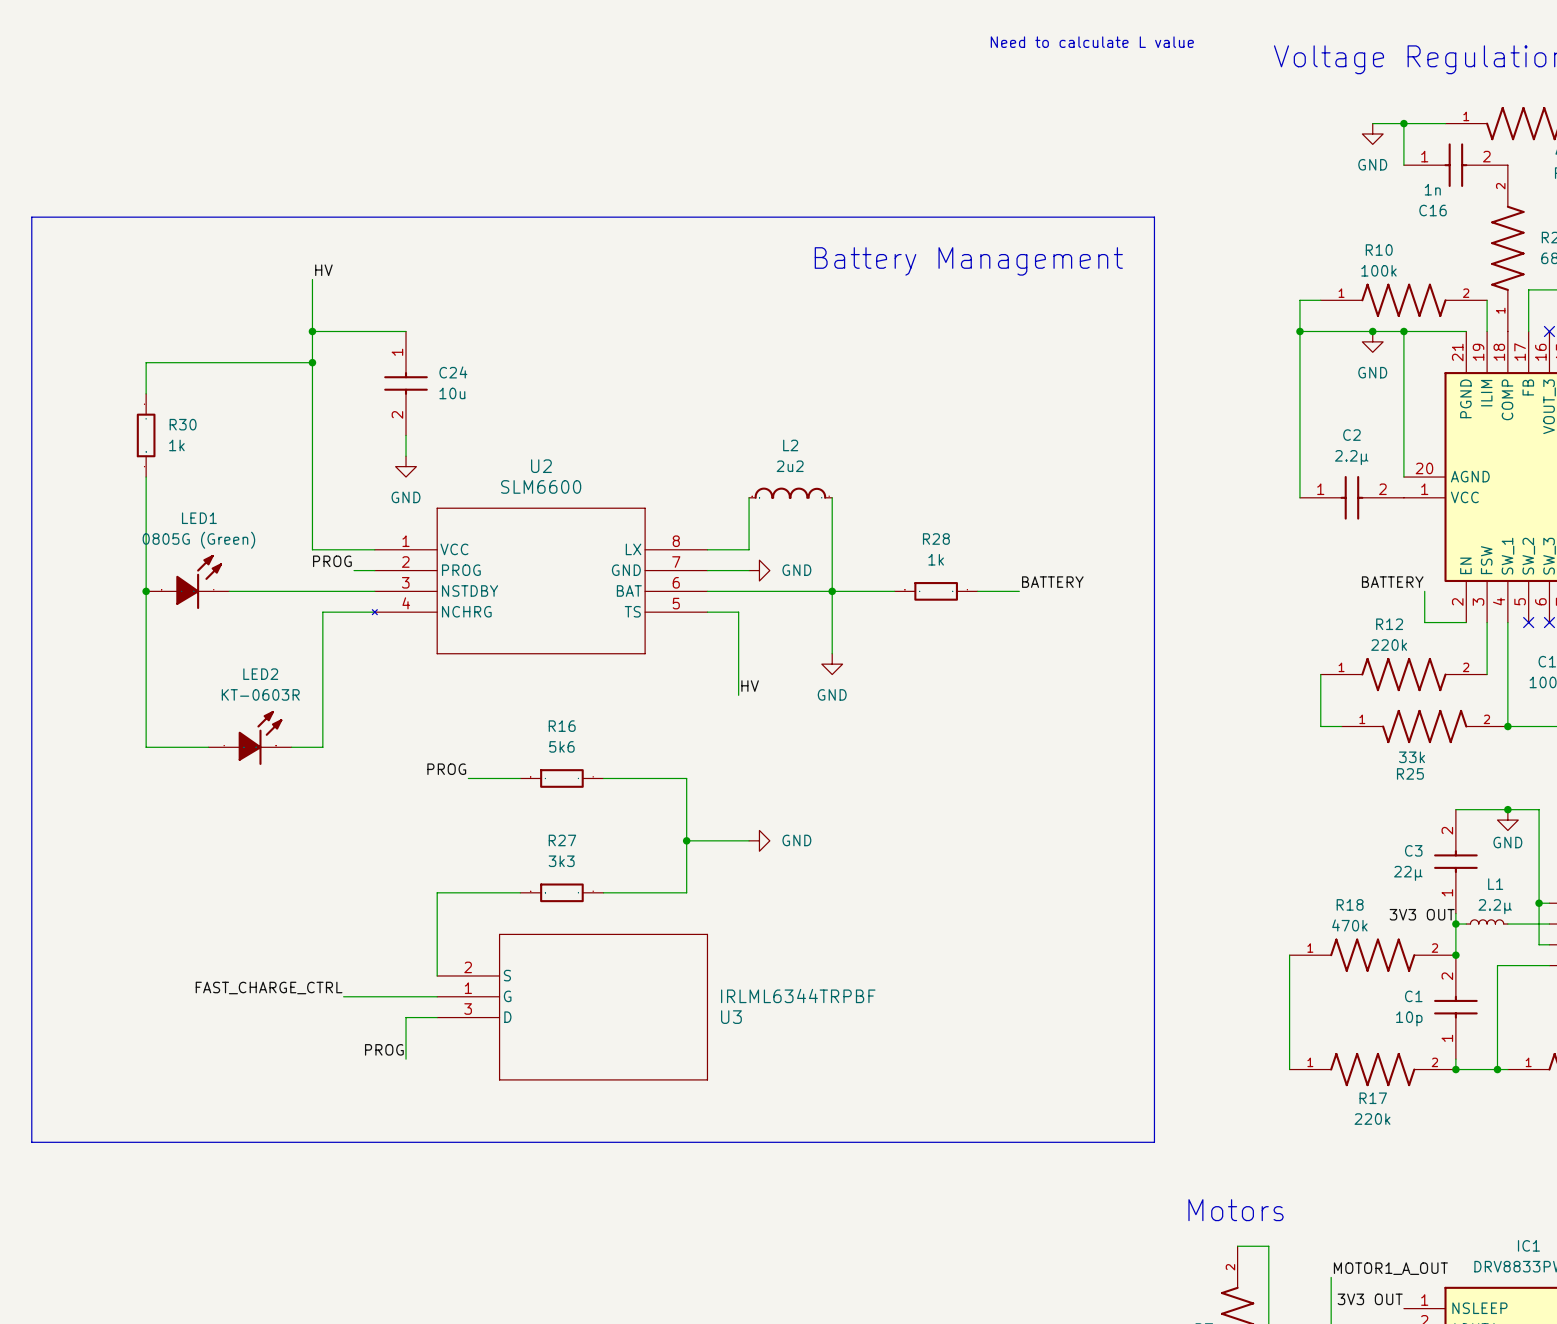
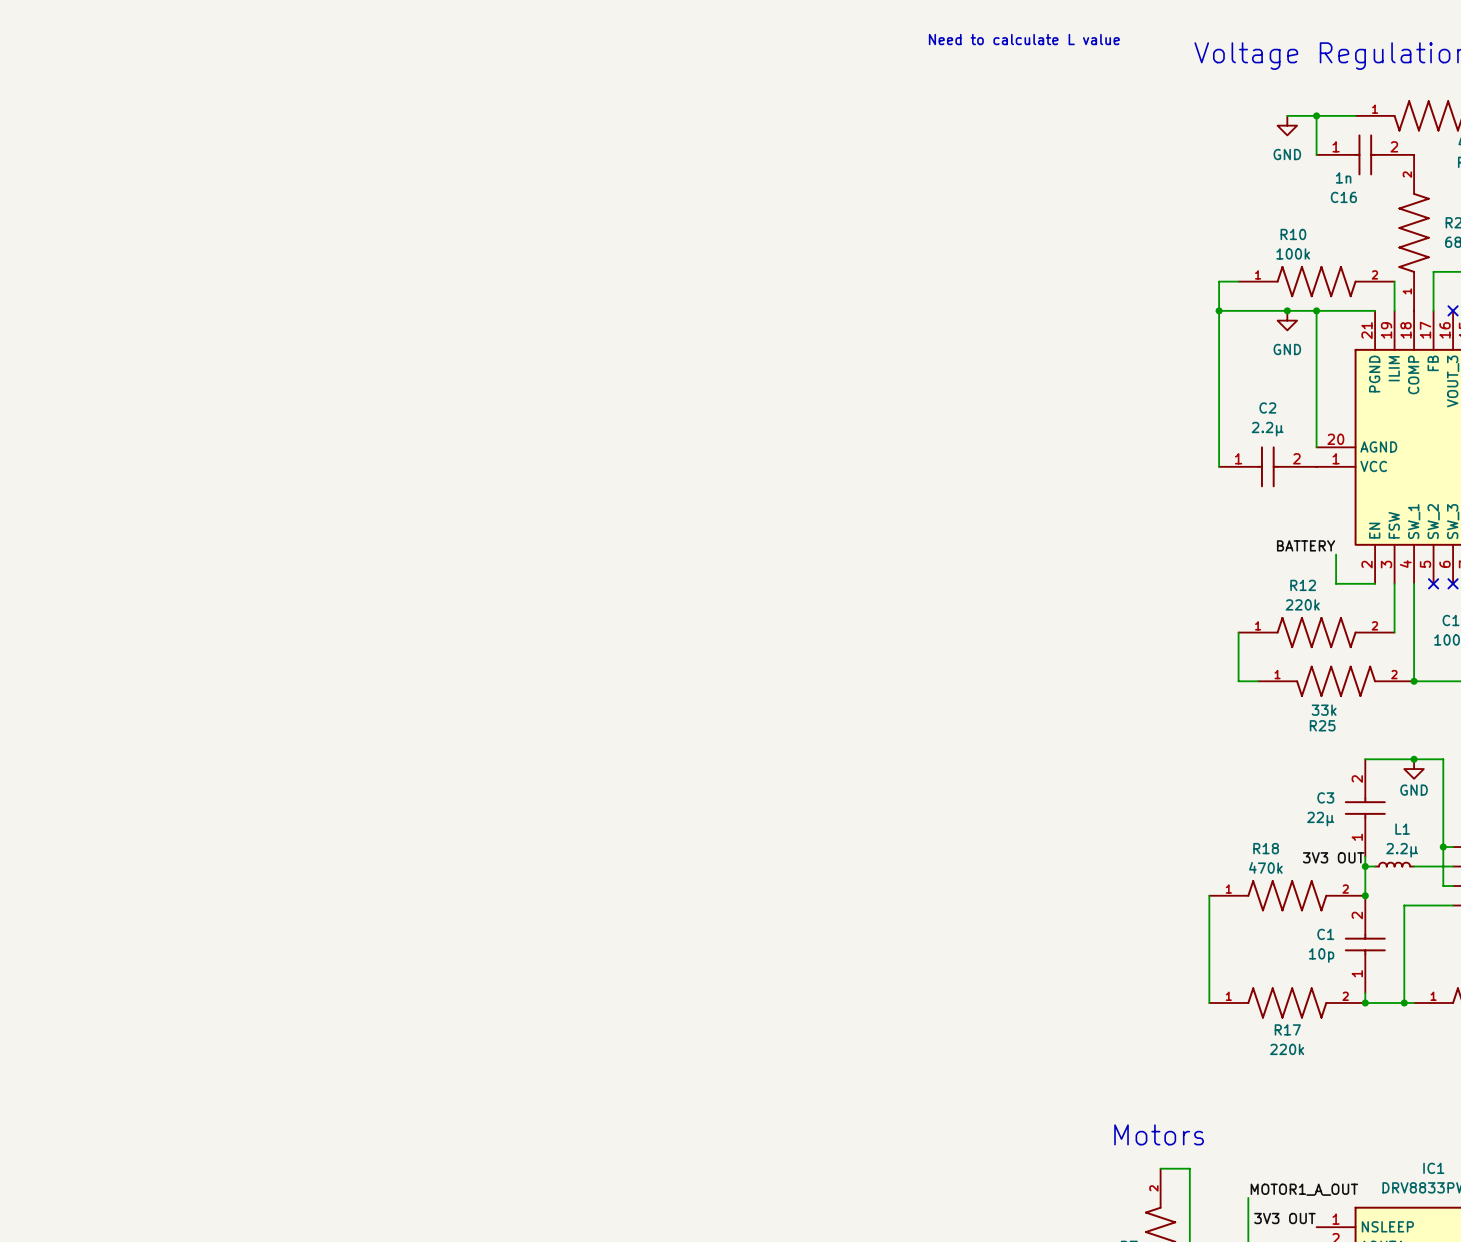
line: (31, 217) (1154, 217) (1154, 1142) (31, 1142) (31, 217) -> none
text: Battery Management (968, 261) -> none
label: HV (323, 270) -> none
wire: (312, 279) (312, 549) (374, 549) -> none
wire: (312, 331) (406, 331) -> none
junction: (312, 331) -> none
wire: (312, 362) (146, 362) (146, 393) -> none
junction: (312, 362) -> none
C24: 10u (406, 383) -> none
R30: 1k (146, 435) -> none
wire: (406, 435) (406, 456) -> none
power symbol: GND (406, 466) -> none
wire: (146, 477) (146, 747) (208, 747) -> none
L2: 2u2 (790, 493) -> none
wire: (749, 497) (749, 549) (707, 549) -> none
wire: (832, 497) (832, 653) -> none
label: PROG (332, 561) -> none
wire: (354, 570) (374, 570) -> none
wire: (707, 570) (749, 570) -> none
power symbol: GND (759, 570) -> none
U2: SLM6600 (539, 580) -> none
LED1: 0805G (Green) (187, 582) -> none
label: BATTERY (1052, 582) -> none
junction: (146, 591) -> none
wire: (229, 591) (374, 591) -> none
wire: (707, 591) (894, 591) -> none
junction: (832, 591) -> none
R28: 1k (936, 591) -> none
wire: (977, 591) (1019, 591) -> none
wire: (374, 612) (322, 612) (322, 747) (291, 747) -> none
wire: (707, 612) (738, 612) (738, 695) -> none
power symbol: GND (832, 664) -> none
label: HV (750, 686) -> none
LED2: KT-0603R (250, 737) -> none
label: PROG (446, 769) -> none
wire: (468, 778) (520, 778) -> none
R16: 5k6 (561, 778) -> none
wire: (603, 778) (686, 778) (686, 892) (603, 892) -> none
wire: (686, 840) (749, 840) -> none
junction: (686, 840) -> none
power symbol: GND (759, 840) -> none
wire: (520, 892) (437, 892) (437, 975) -> none
R27: 3k3 (561, 892) -> none
label: FAST_CHARGE_CTRL (269, 987) -> none
wire: (343, 996) (437, 996) -> none
U3: IRLML6344TRPBF (572, 1007) -> none
wire: (437, 1017) (406, 1017) (406, 1059) -> none
label: PROG (384, 1049) -> none

